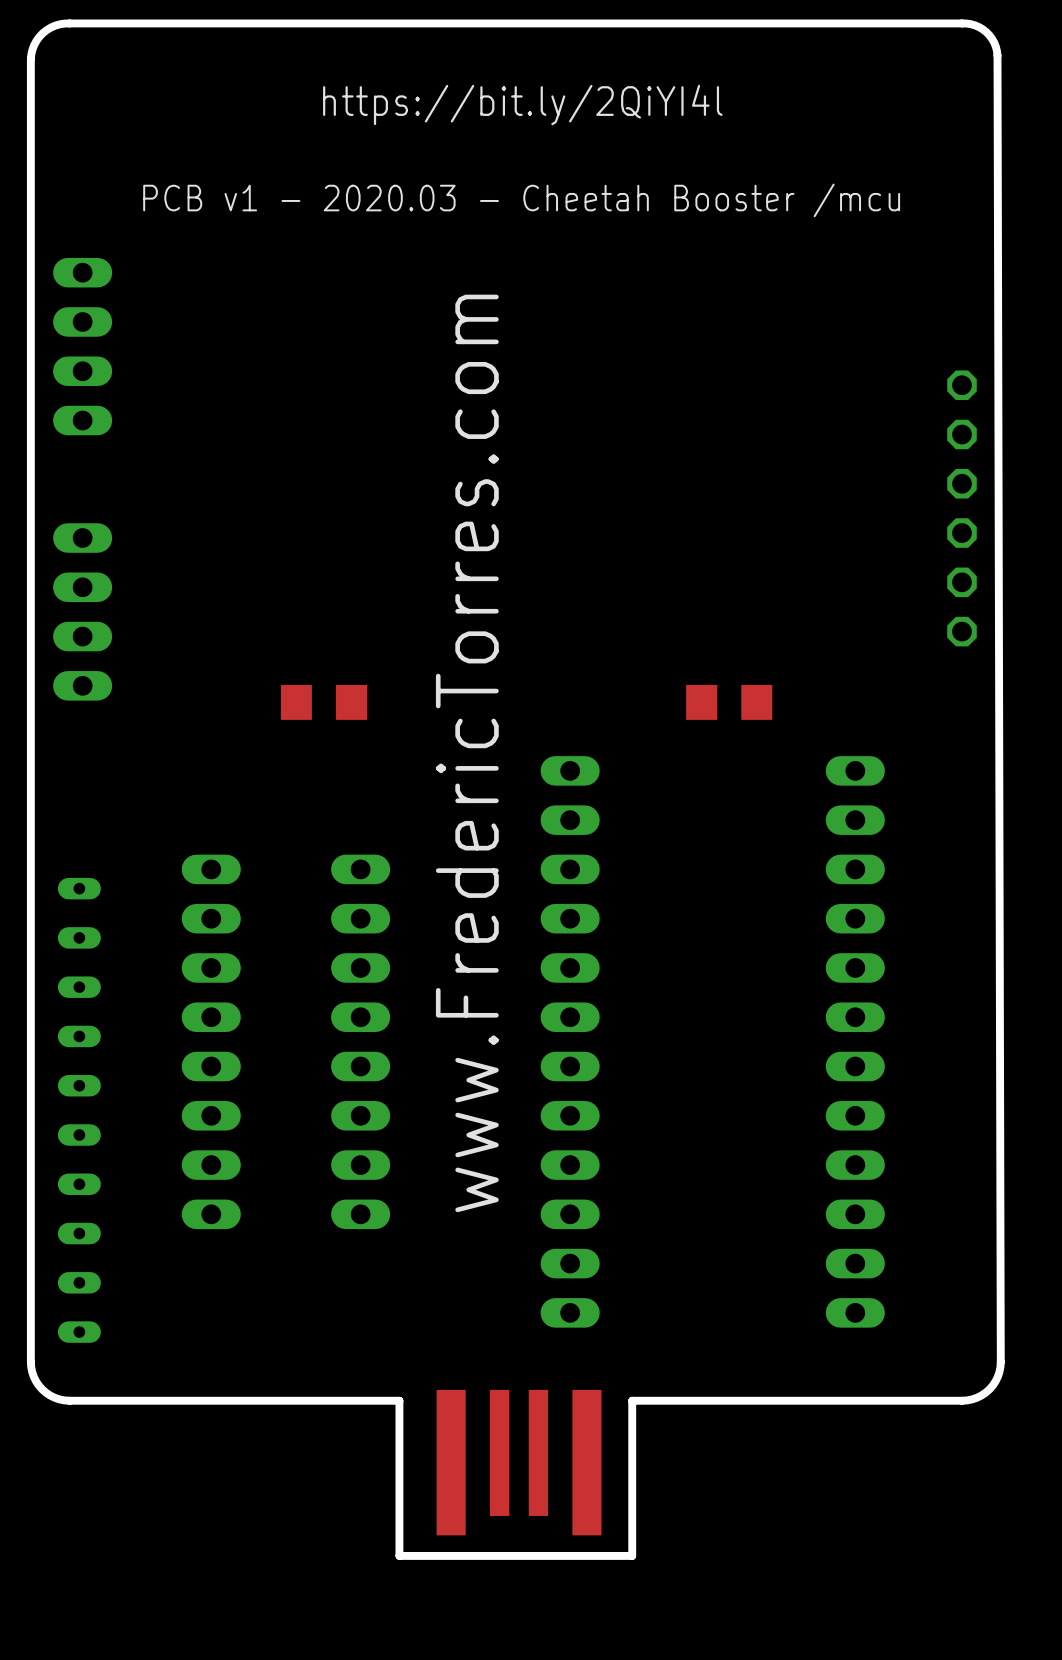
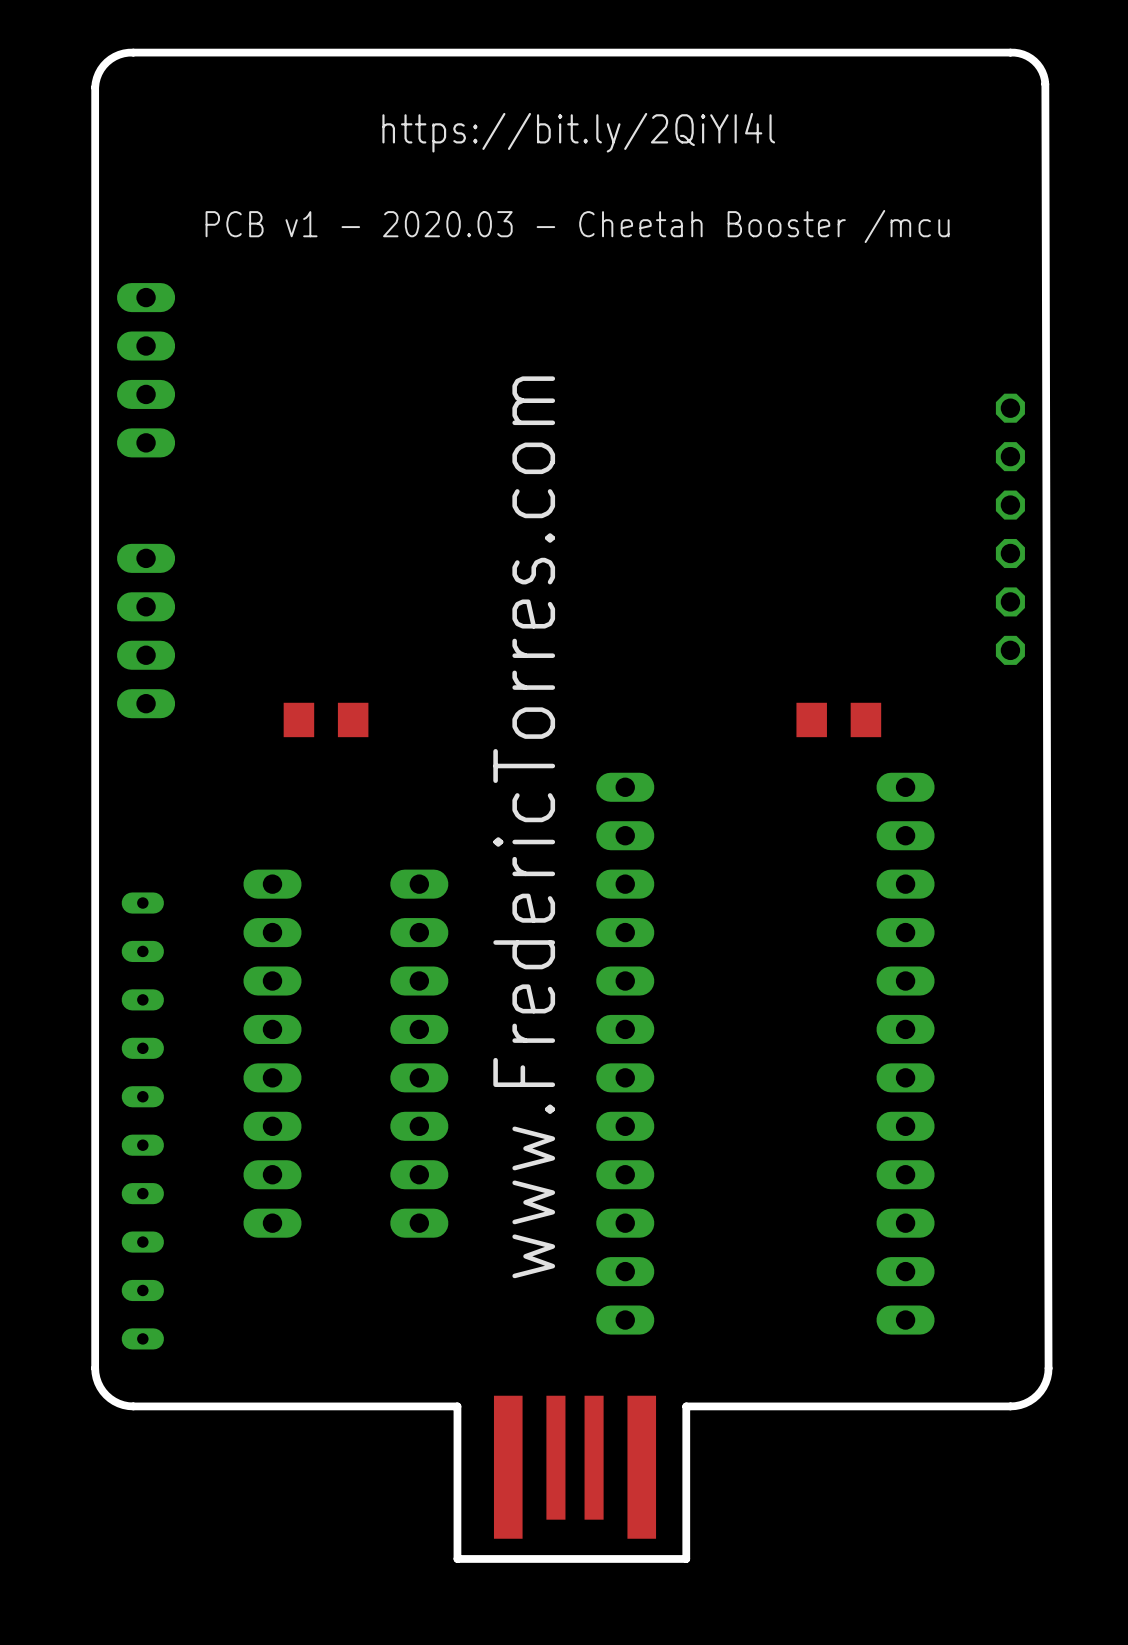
part position: (323, 702) -> (326, 719)
part position: (729, 702) -> (838, 719)
text position: www.FredericTorres.com (467, 753) -> www.FredericTorres.com (524, 827)

